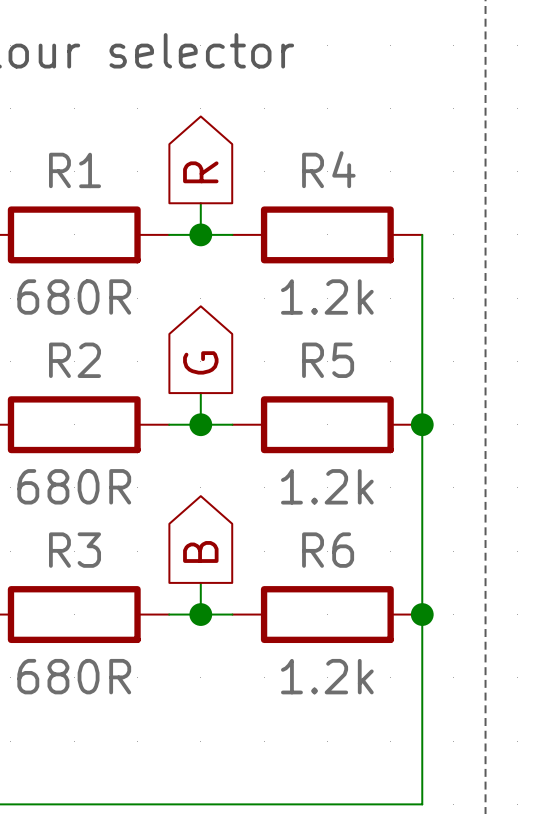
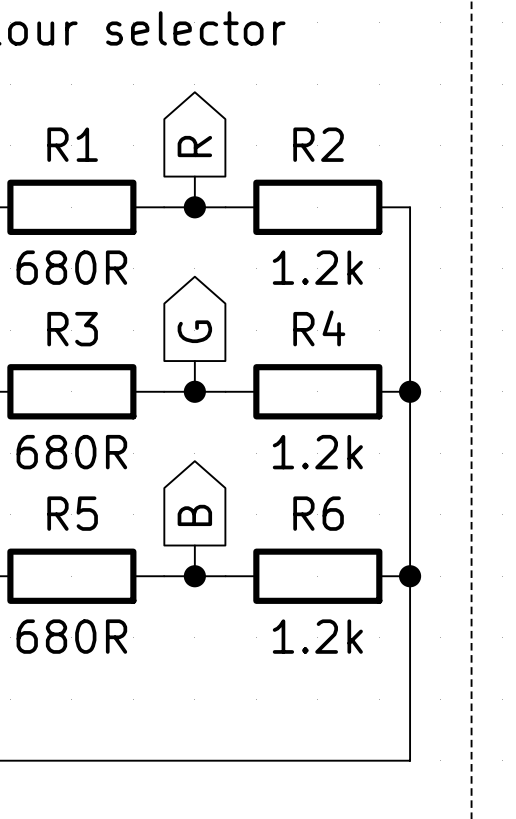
R4 name: R4 (328, 169) -> R2 (318, 144)
R2 name: R2 (75, 360) -> R3 (72, 329)
R5 name: R5 (328, 360) -> R4 (319, 328)
R3 name: R3 (75, 550) -> R5 (72, 513)

